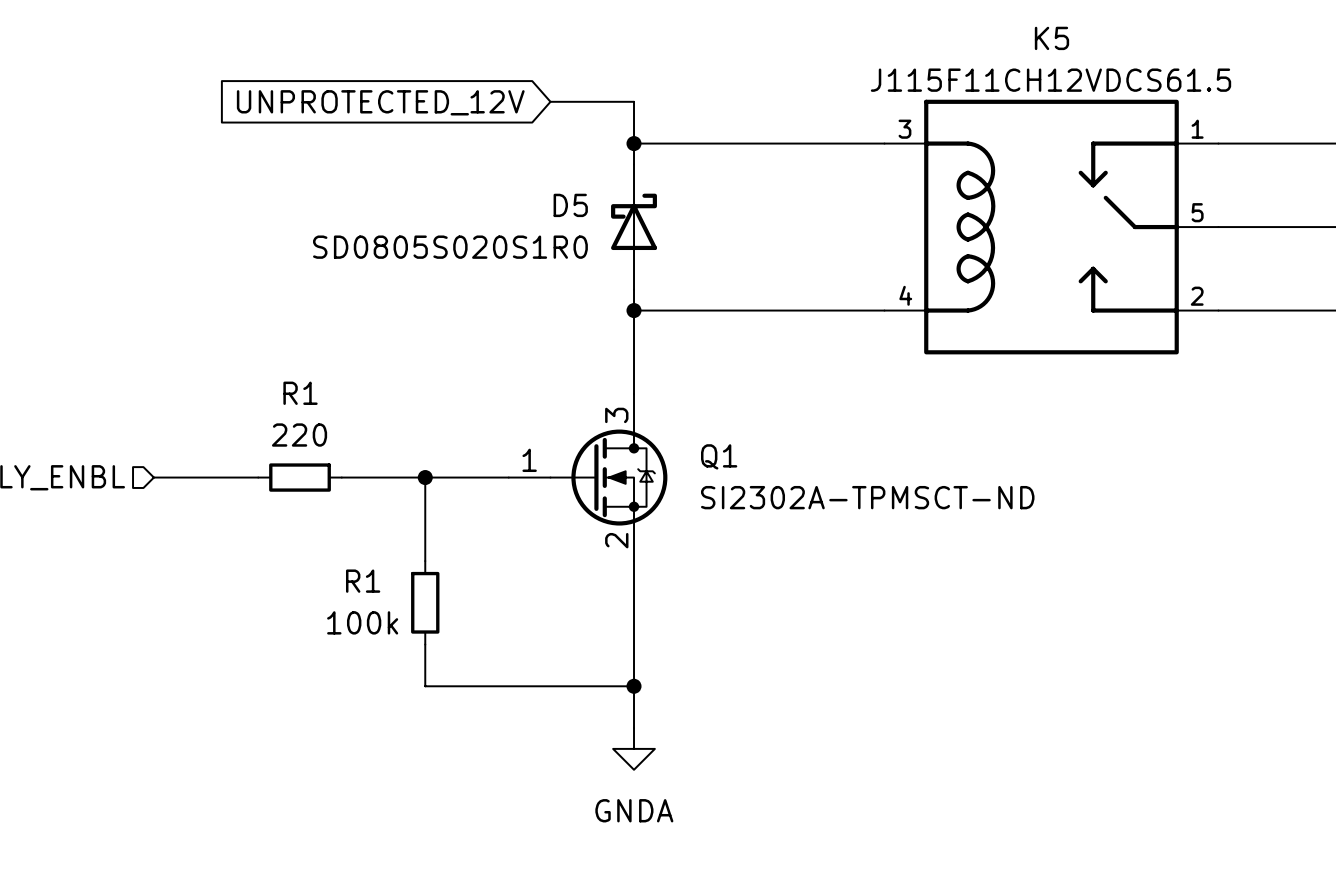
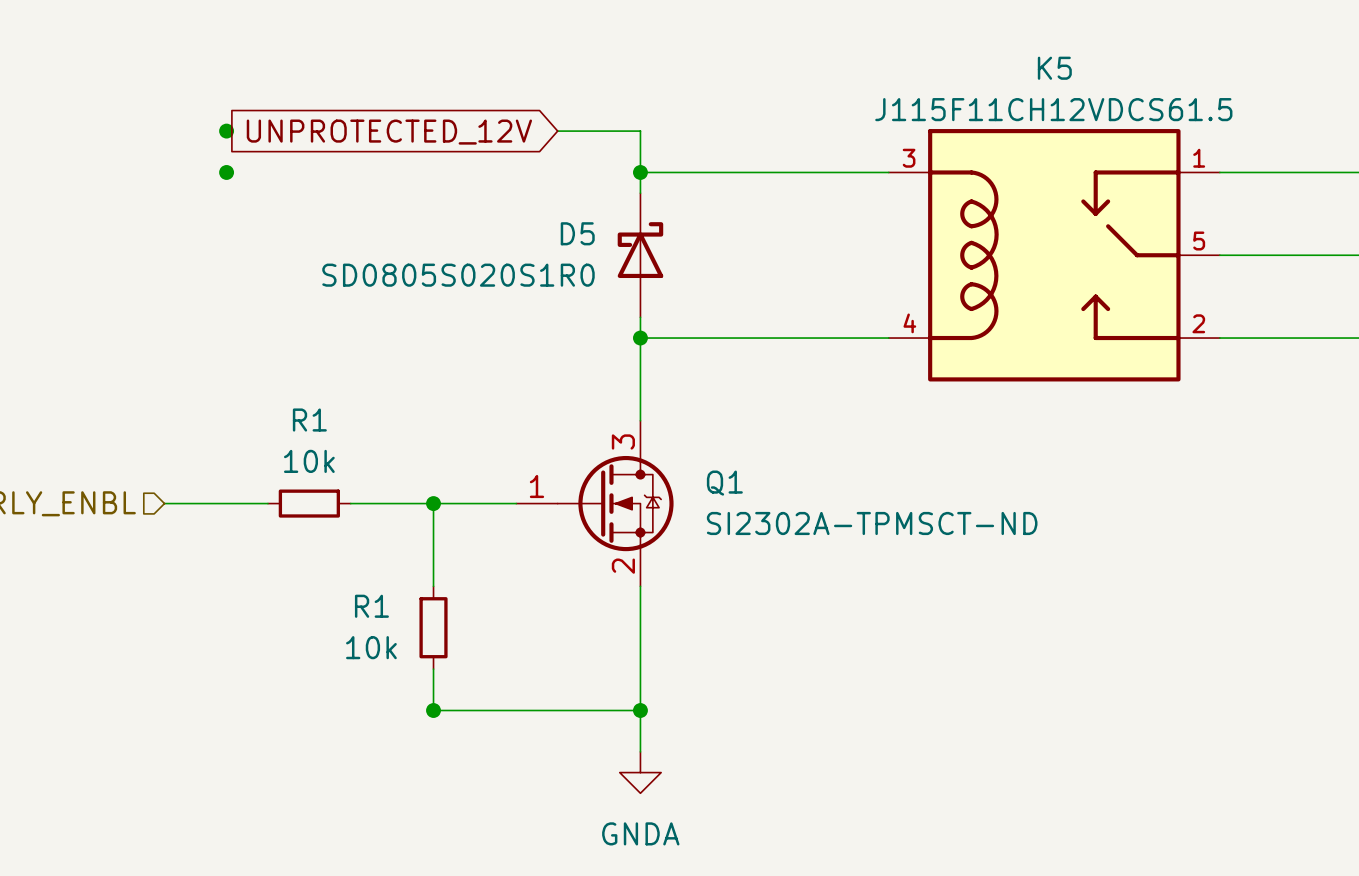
junction: none -> (226, 131)
junction: none -> (226, 172)
R1 value: 220 (299, 435) -> 10k (309, 461)
R1 value: 100k (362, 622) -> 10k (371, 647)
junction: none -> (433, 710)

